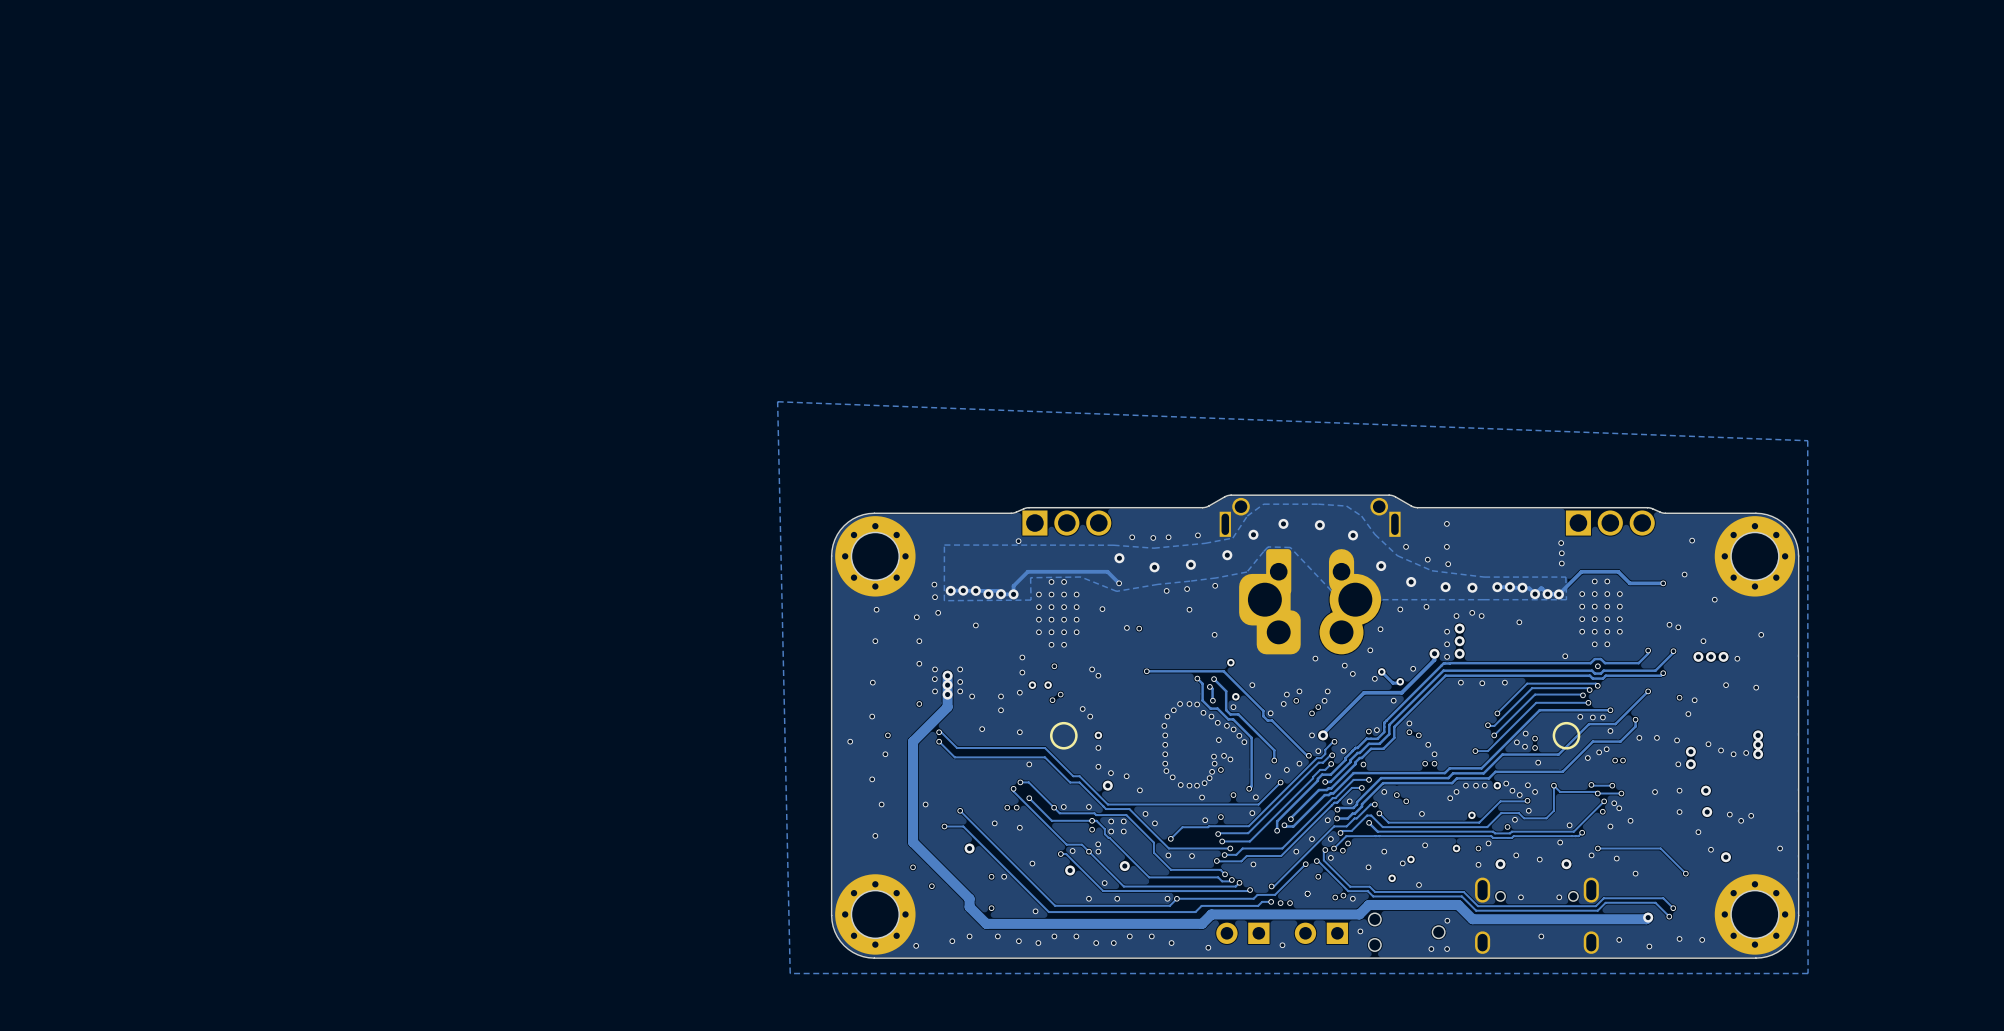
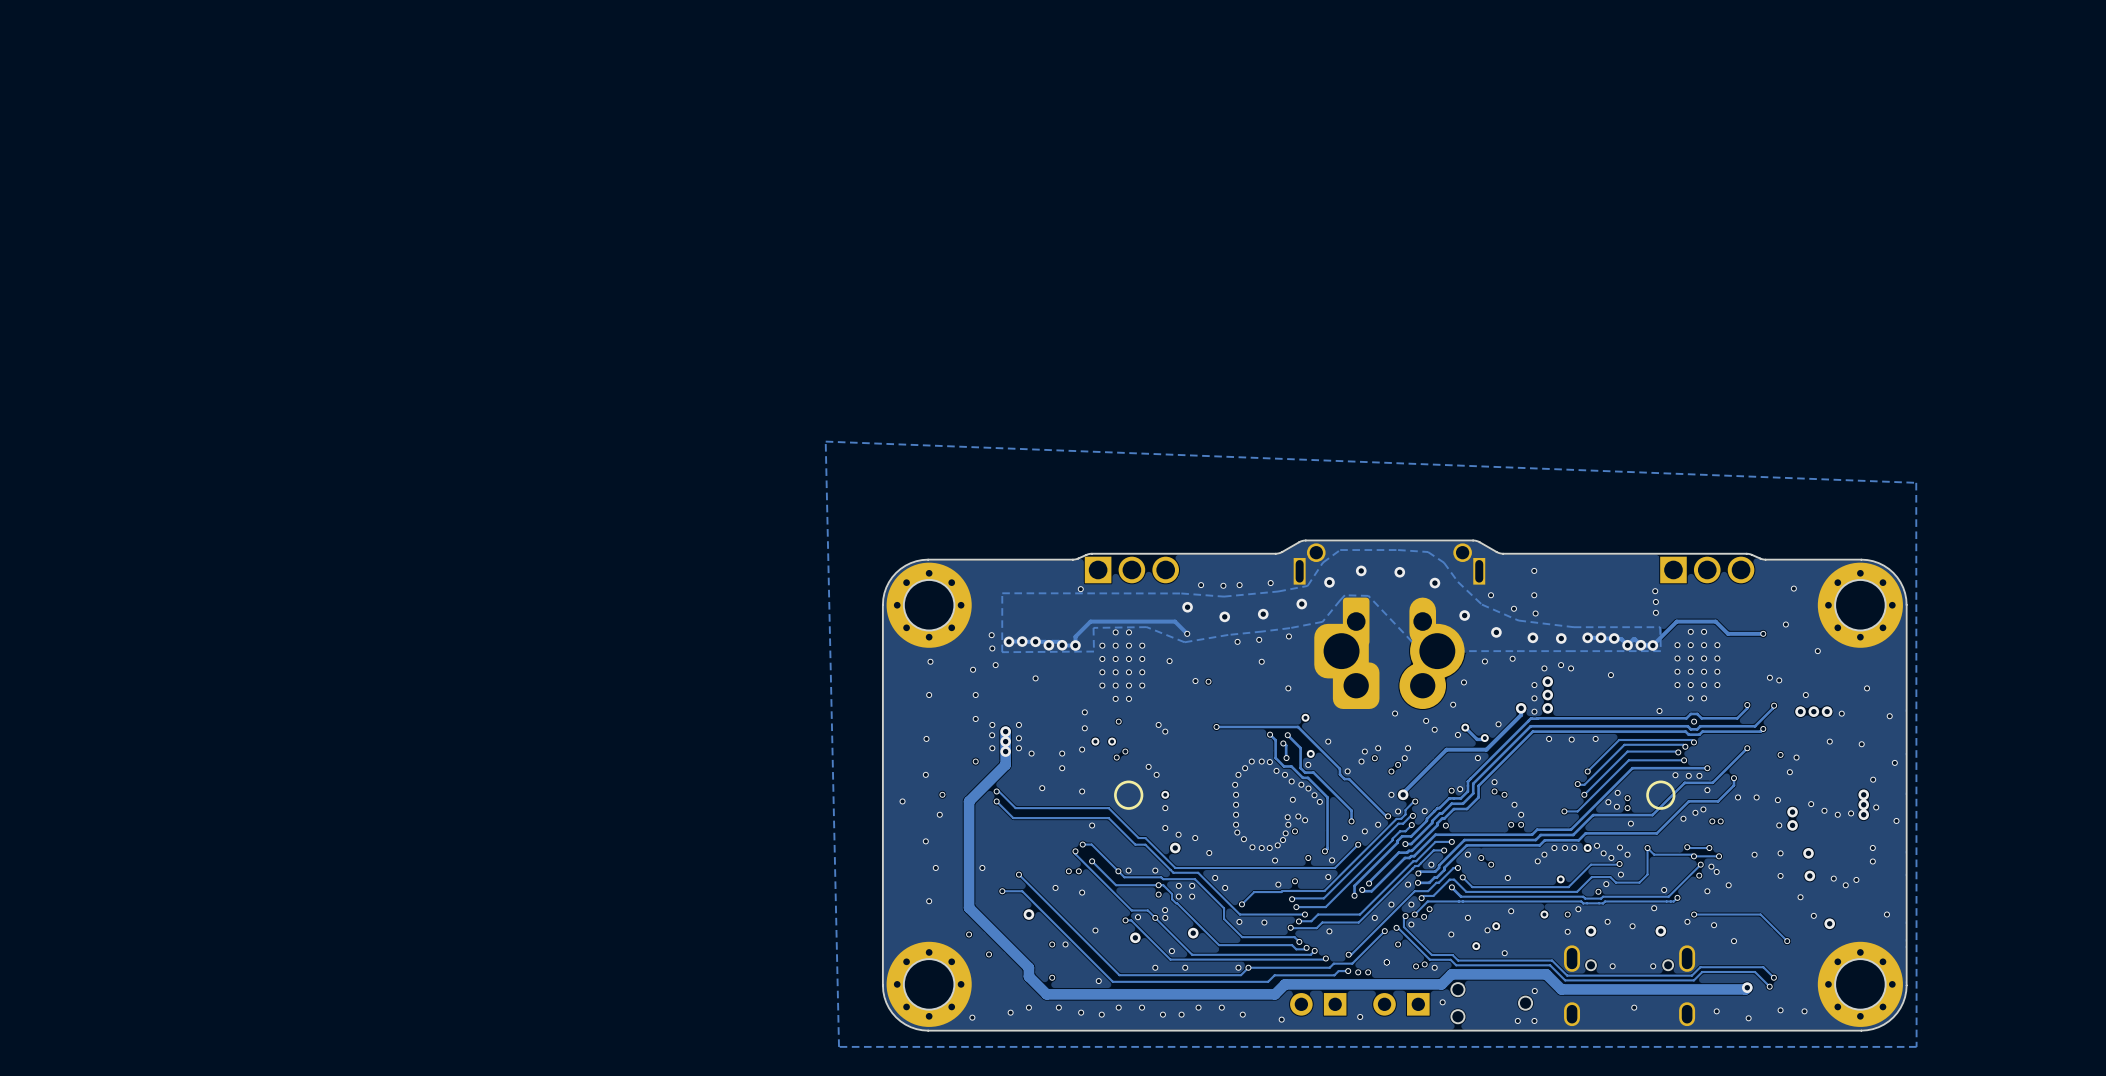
via: none -> (1889, 716)
via: none -> (1894, 762)
via: none -> (1873, 779)
via: none -> (1876, 807)
via: none -> (1896, 820)
via: none -> (1872, 847)
via: none -> (1872, 861)

